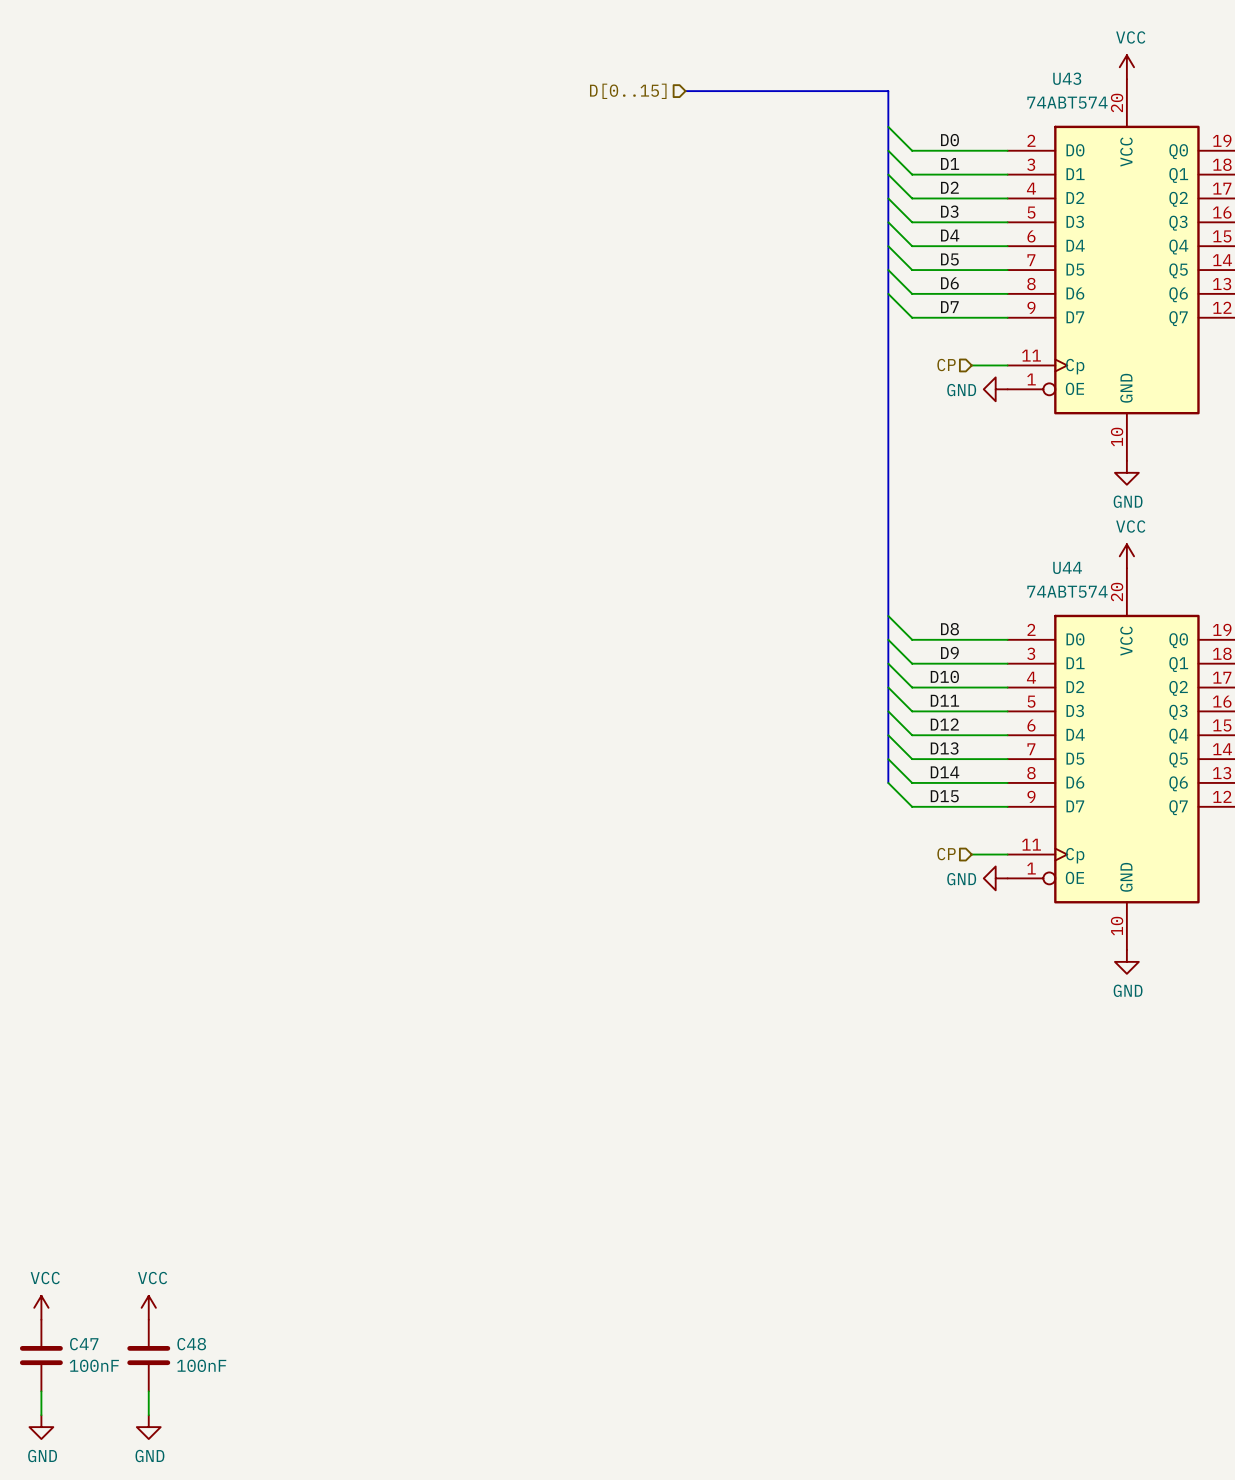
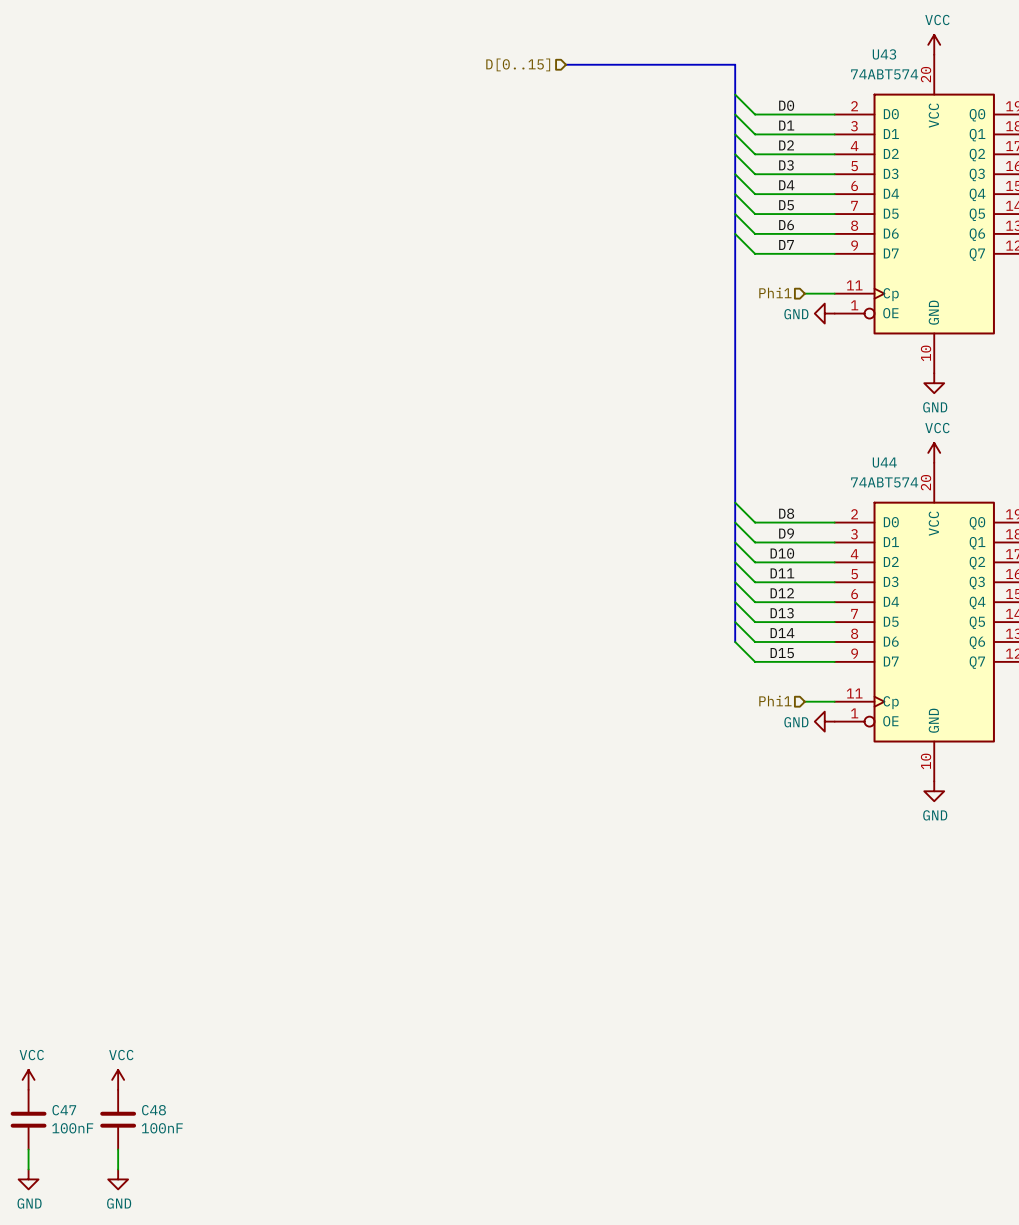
hierarchical label: CP (946, 365) -> Phi1 (775, 292)
hierarchical label: CP (946, 854) -> Phi1 (775, 700)

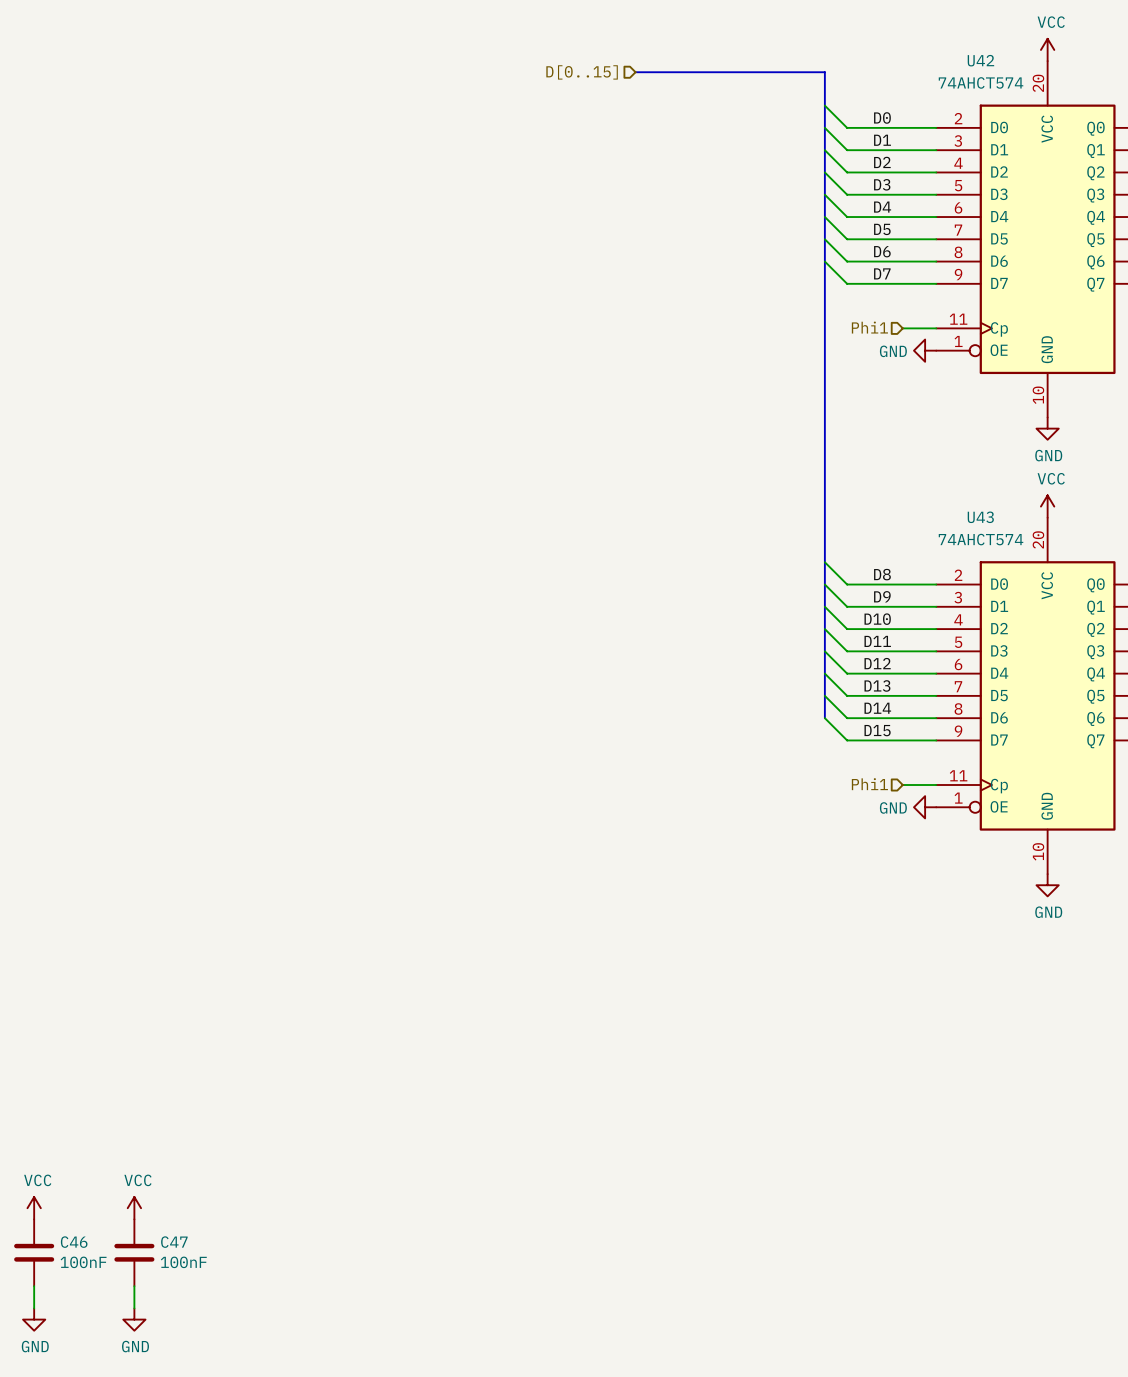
U43 name: U43 (884, 54) -> U42 (980, 60)
U43 value: 74ABT574 (884, 74) -> 74AHCT574 (981, 82)
U44 name: U44 (884, 462) -> U43 (980, 517)
U44 value: 74ABT574 (884, 482) -> 74AHCT574 (981, 539)
C47 name: C47 (64, 1110) -> C46 (74, 1242)
C48 name: C48 (153, 1110) -> C47 (174, 1242)

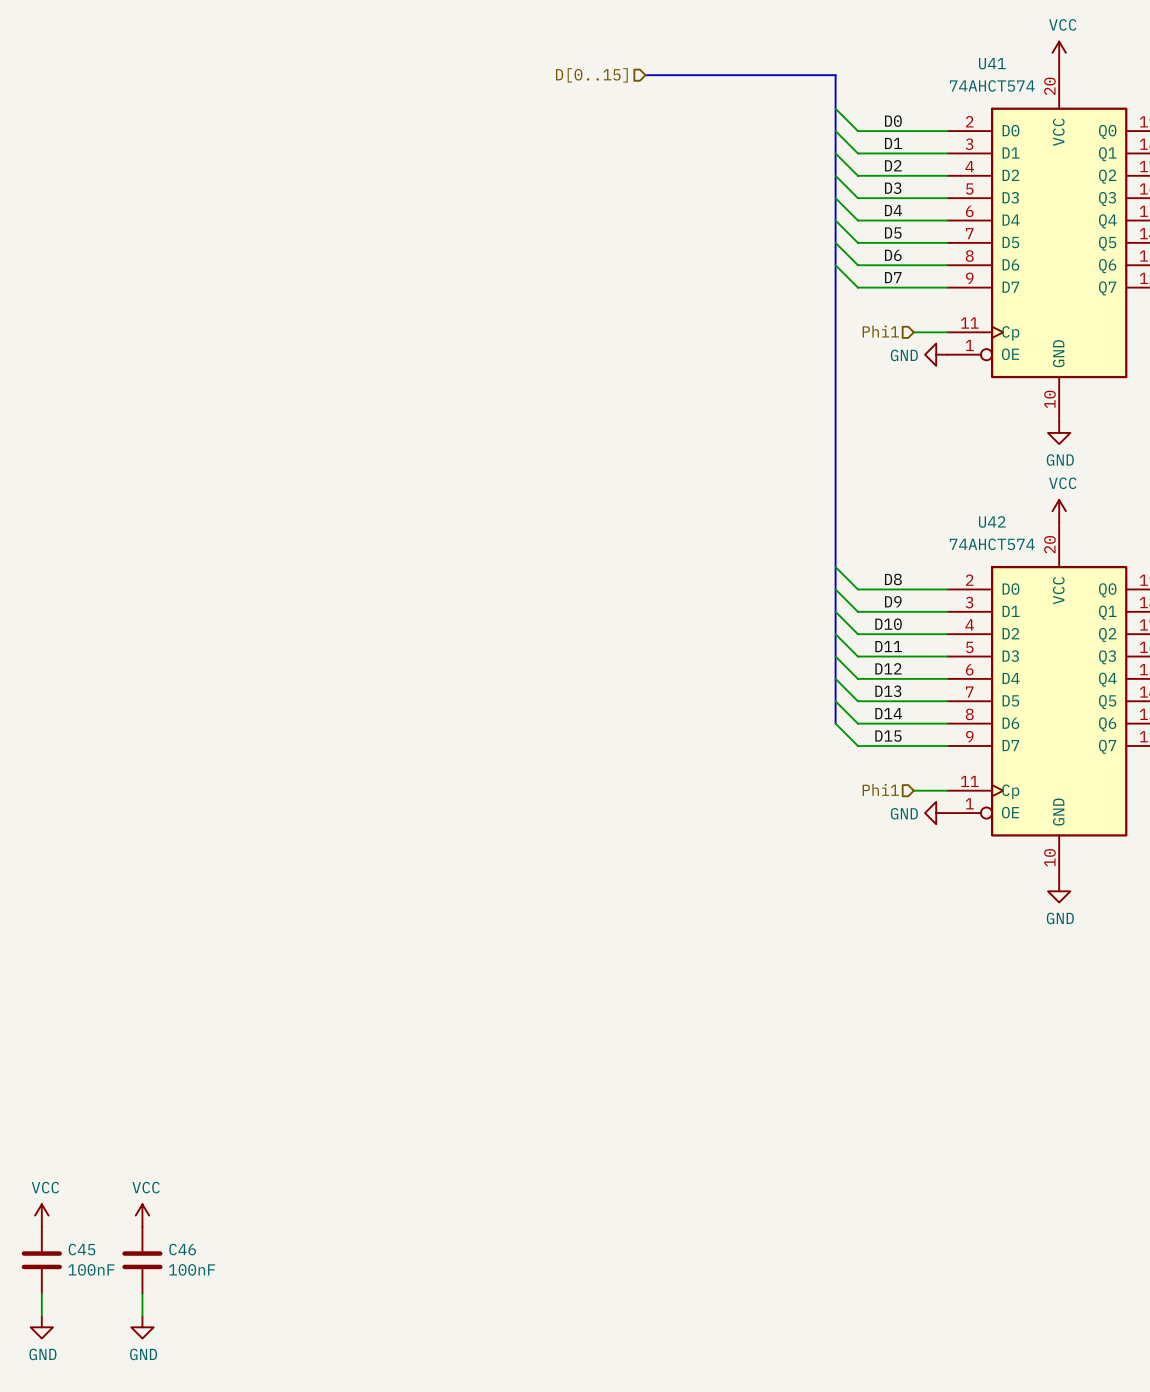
U42 name: U42 (980, 60) -> U41 (992, 63)
U43 name: U43 (980, 517) -> U42 (992, 521)
C46 name: C46 (74, 1242) -> C45 (81, 1249)
C47 name: C47 (174, 1242) -> C46 (182, 1249)

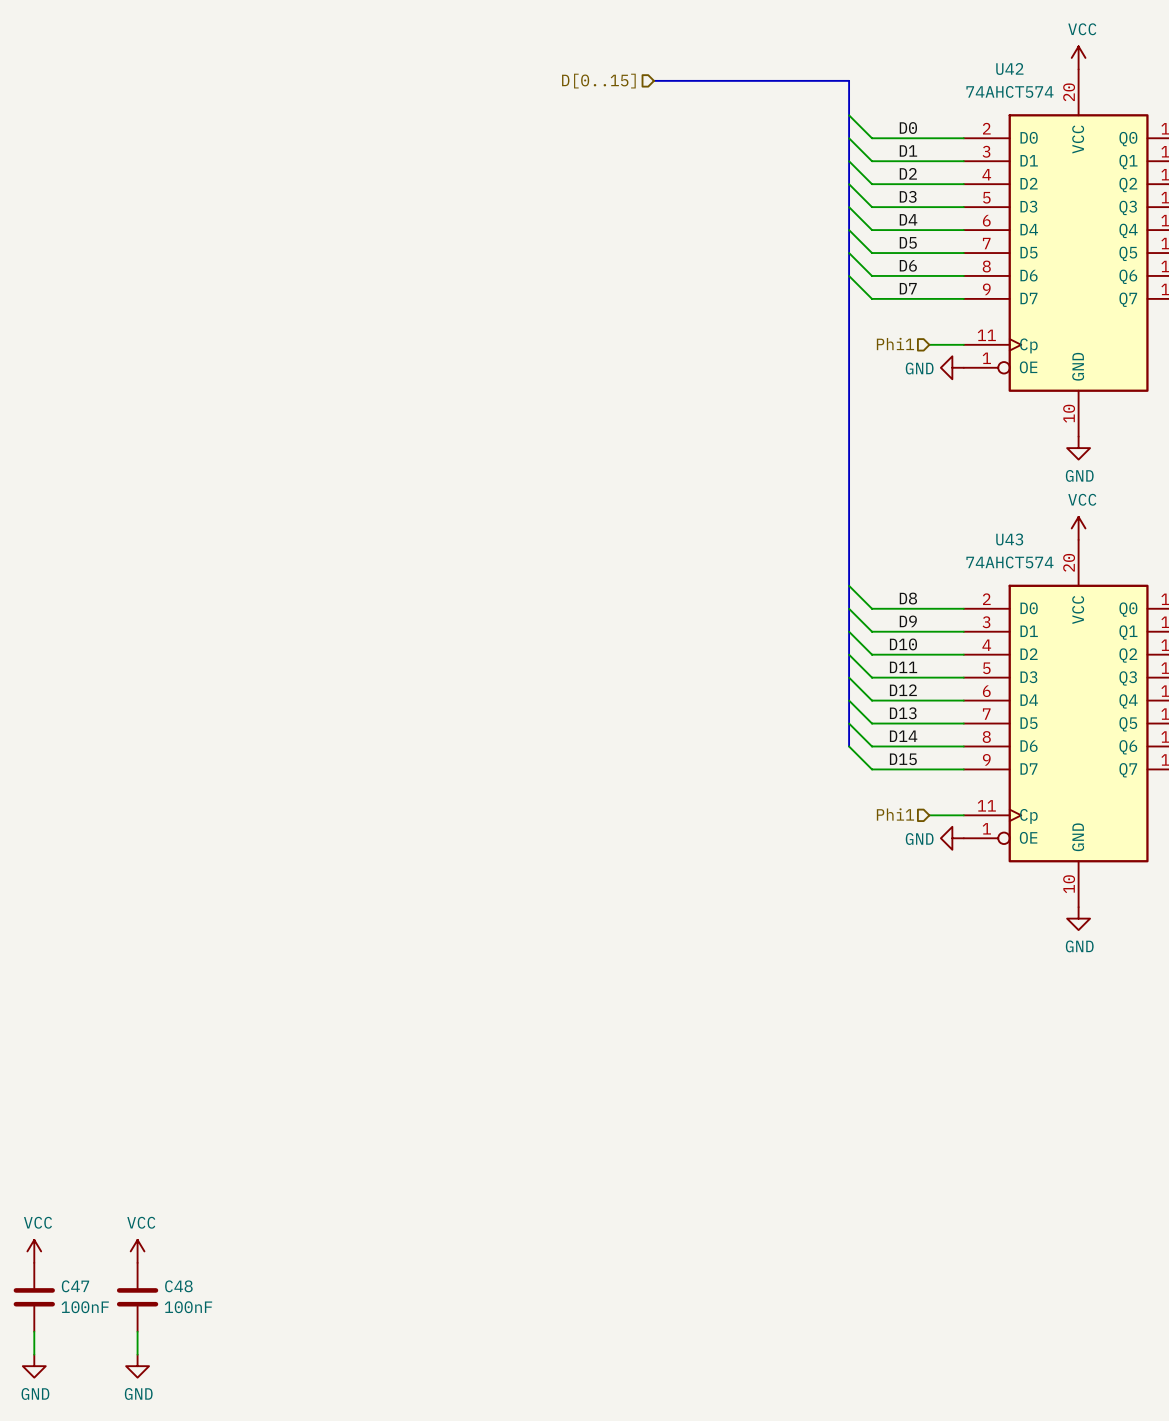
U41 name: U41 (992, 63) -> U42 (1009, 68)
U42 name: U42 (992, 521) -> U43 (1009, 539)
C45 name: C45 (81, 1249) -> C47 (75, 1286)
C46 name: C46 (182, 1249) -> C48 (178, 1286)

